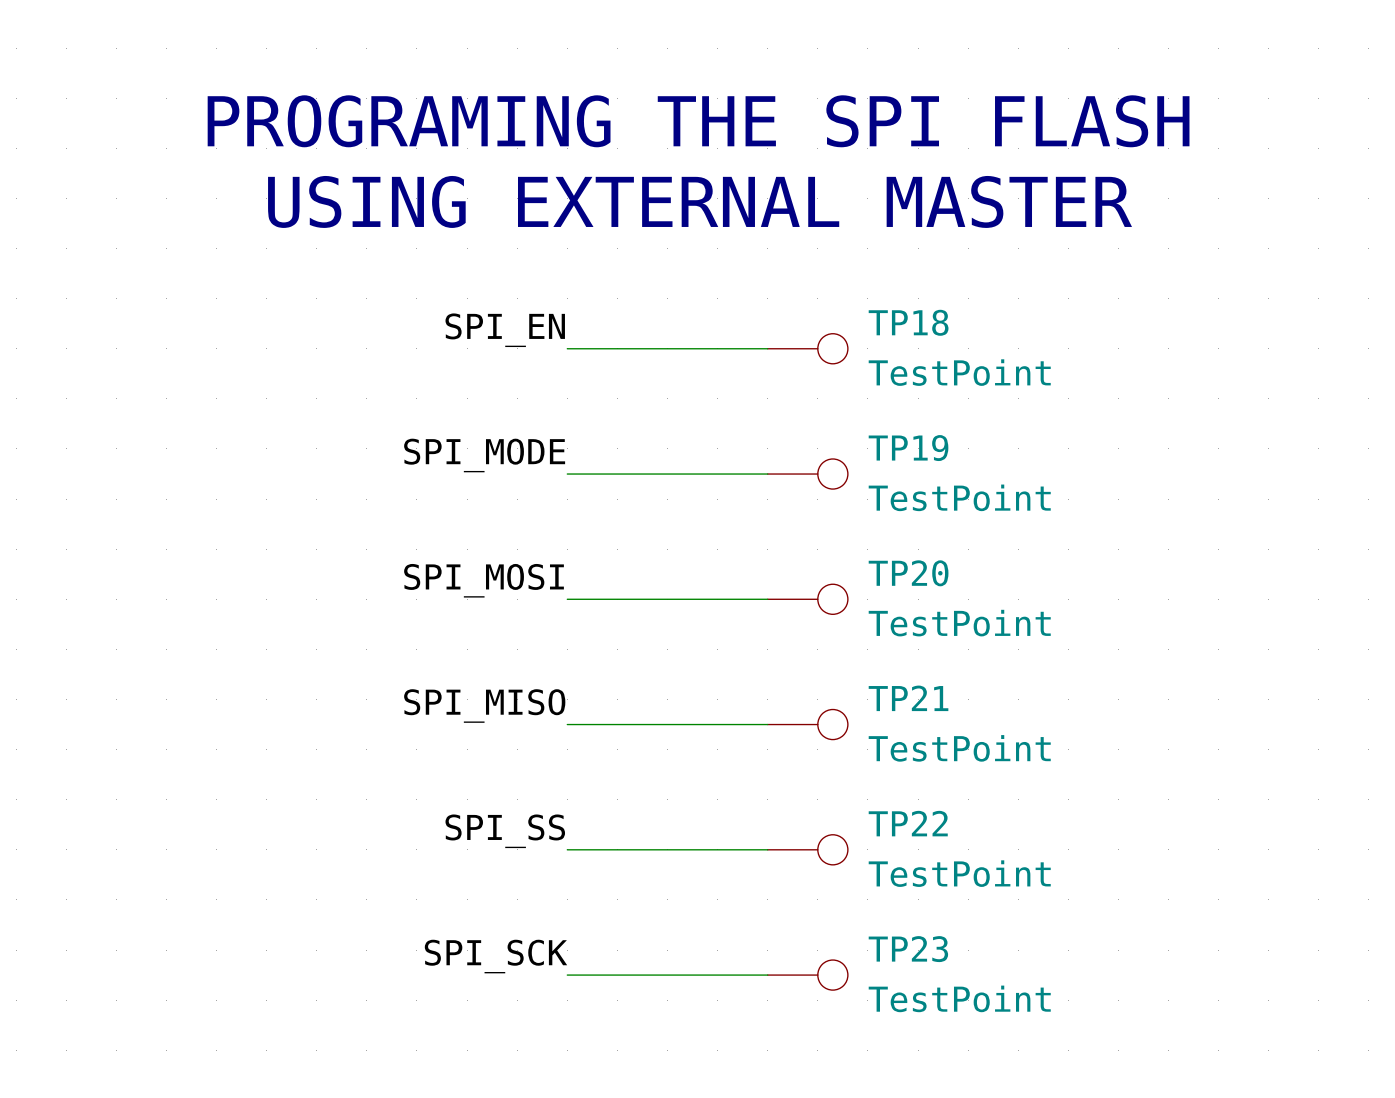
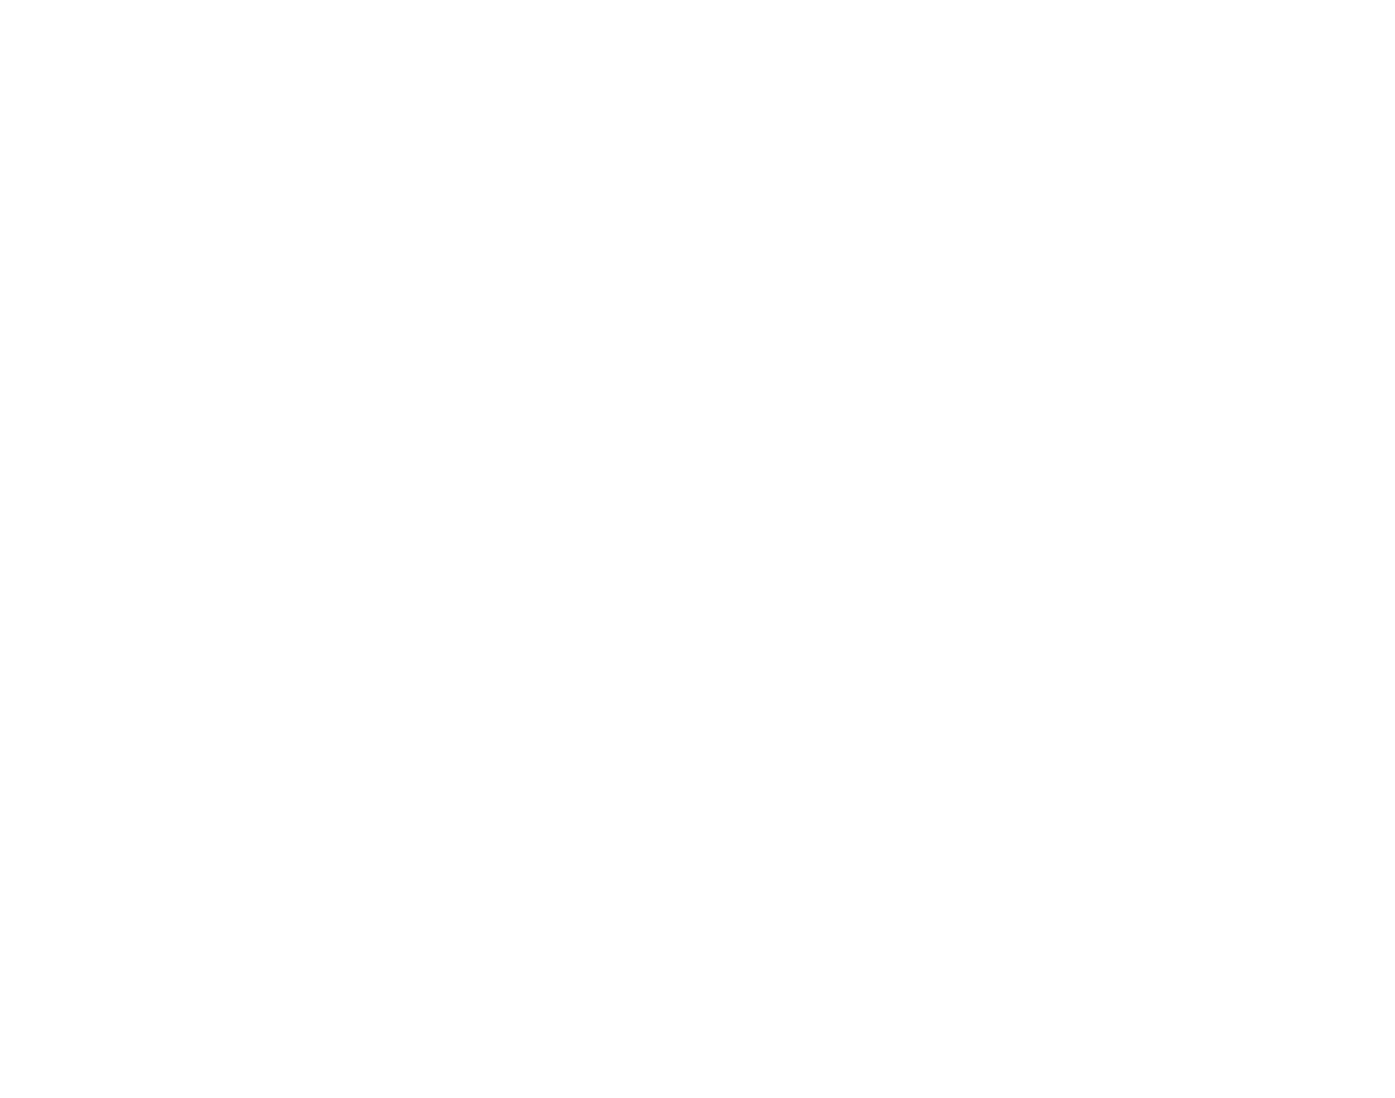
text: PROGRAMING THE SPI FLASH (698, 121) -> none
text: USING EXTERNAL MASTER (700, 201) -> none
label: SPI_EN (505, 330) -> none
wire: (567, 348) (767, 348) -> none
TP18: TestPoint (807, 348) -> none
label: SPI_MODE (484, 455) -> none
wire: (567, 474) (767, 474) -> none
TP19: TestPoint (807, 474) -> none
label: SPI_MOSI (484, 580) -> none
wire: (567, 599) (767, 599) -> none
TP20: TestPoint (807, 599) -> none
label: SPI_MISO (484, 706) -> none
wire: (567, 724) (767, 724) -> none
TP21: TestPoint (807, 724) -> none
label: SPI_SS (505, 831) -> none
wire: (567, 849) (767, 849) -> none
TP22: TestPoint (807, 849) -> none
label: SPI_SCK (495, 956) -> none
wire: (567, 975) (767, 975) -> none
TP23: TestPoint (807, 975) -> none

